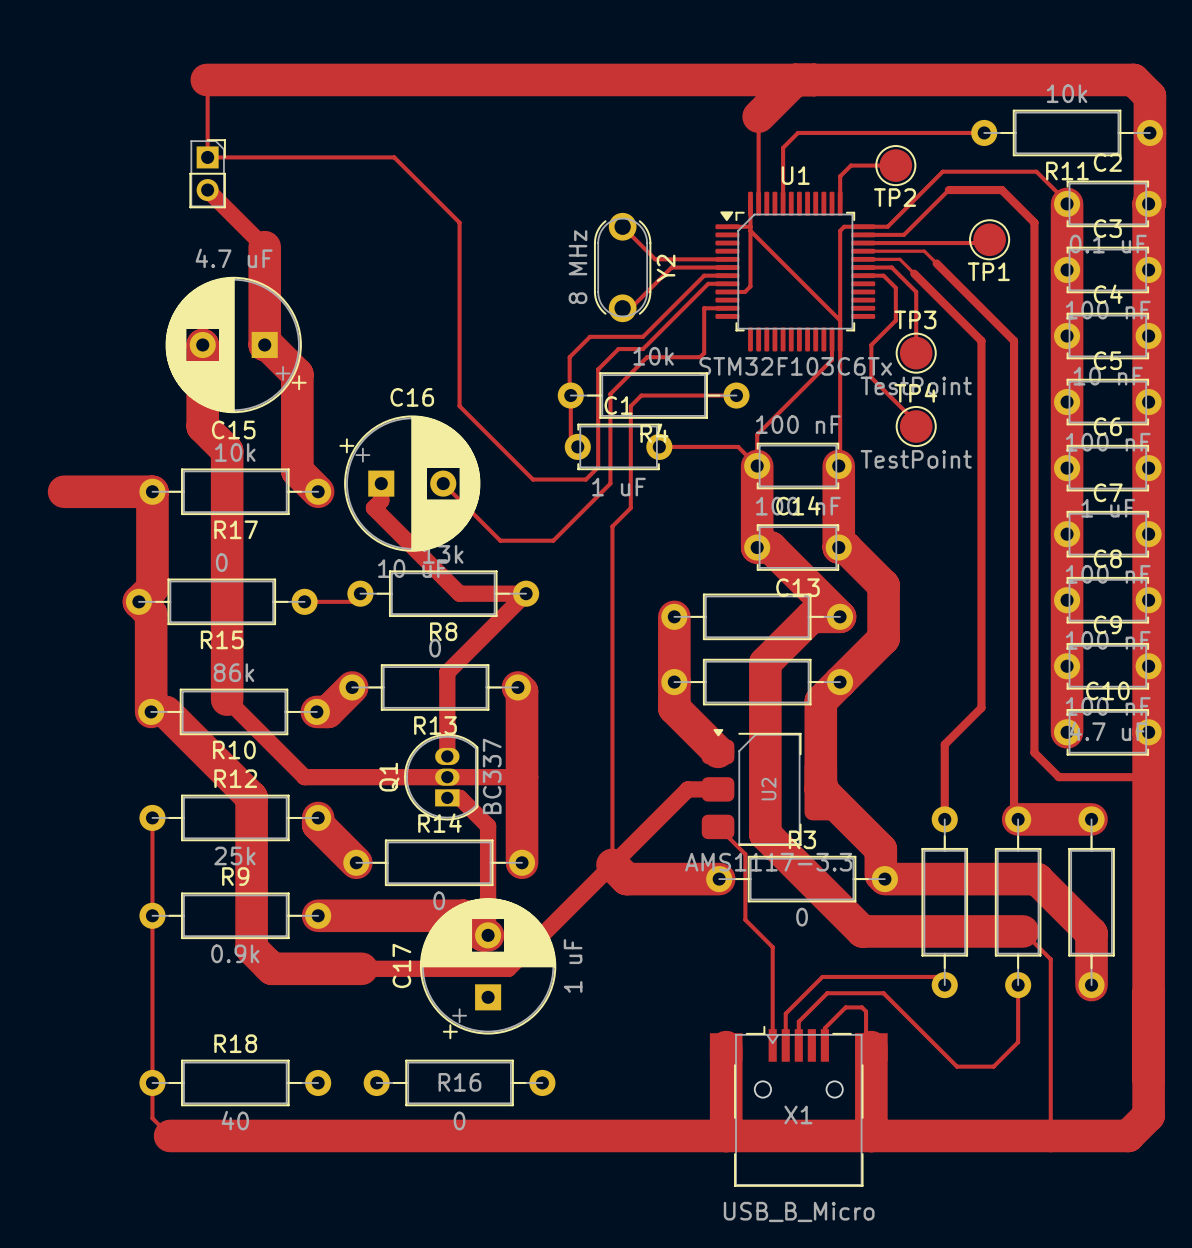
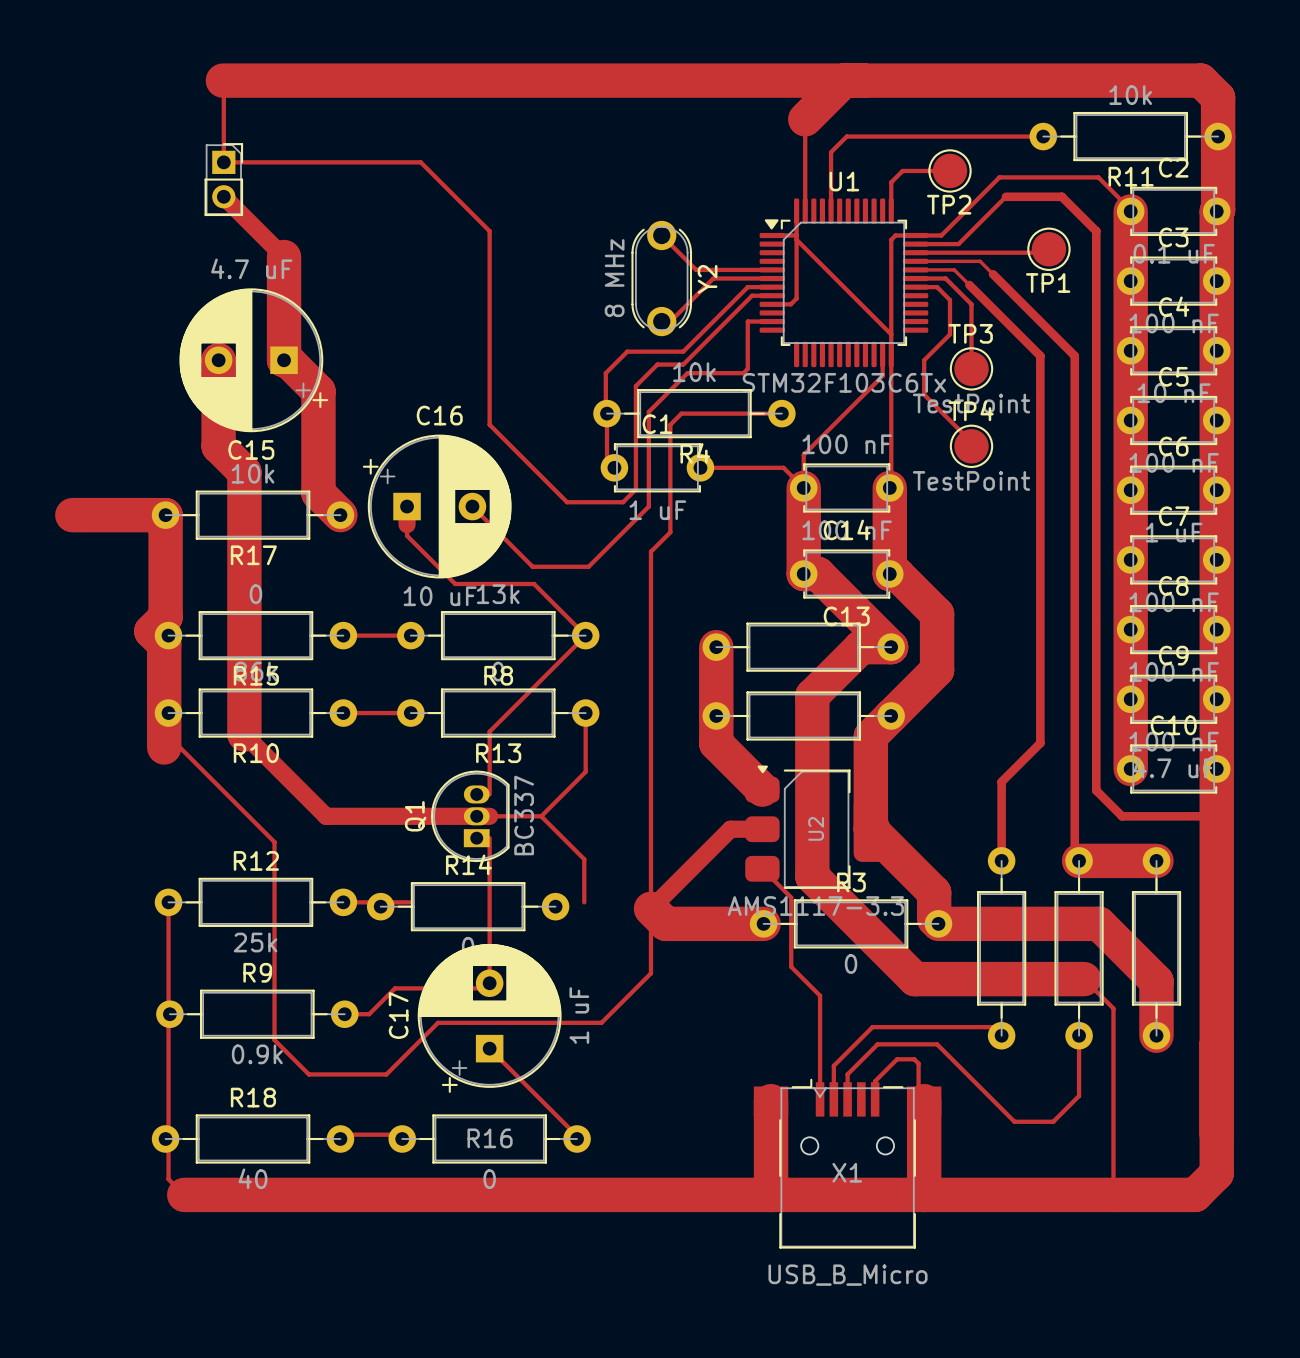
track: (381, 500) (373, 508) (459, 593) (526, 593) (447, 672) (447, 756) -> (407, 524) (407, 535) (455, 583) (534, 583) (585, 635) (489, 731) (489, 794)
track: (360, 593) (352, 601) (304, 601) -> none
R8 position: (443, 593) -> (498, 635)
R15 position: (221, 601) -> (255, 635)
track: none -> (343, 635) (410, 635)
track: none -> (343, 713) (410, 713)
track: none -> (585, 713) (585, 771) (541, 816) (584, 859) (584, 902)
track: (352, 687) (327, 711) (316, 711) -> none
R13 position: (435, 687) -> (498, 713)
track: (517, 687) (522, 691) (522, 862) -> none
track width: thick (166, 711) (251, 797) -> thin (179, 747) (270, 837)
R10 position: (234, 711) -> (255, 713)
track width: thick (459, 777) (508, 777) -> thin (489, 816) (541, 816)
track: (251, 797) (251, 948) (272, 968) (508, 968) (612, 864) -> (270, 837) (274, 842) (274, 1040) (308, 1074) (386, 1074) (438, 1022) (601, 1022) (650, 973) (650, 908)
track: (447, 797) (459, 797) (488, 826) (488, 935) (483, 935) (463, 915) (318, 915) -> none
track: none -> (489, 838) (489, 983) (484, 988) (394, 988) (369, 1014) (344, 1014)
track: (152, 817) (152, 1118) (155, 1121) -> (168, 902) (168, 1179)
R12 position: (235, 817) -> (255, 902)
track: (318, 817) (318, 824) (356, 862) -> none
track: none -> (343, 902) (409, 902)
R9 position: (235, 915) -> (257, 1014)
C17 position: (488, 968) -> (489, 1018)
track: none -> (489, 1048) (575, 1134) (585, 1134)
track: none -> (344, 1134) (410, 1134)

